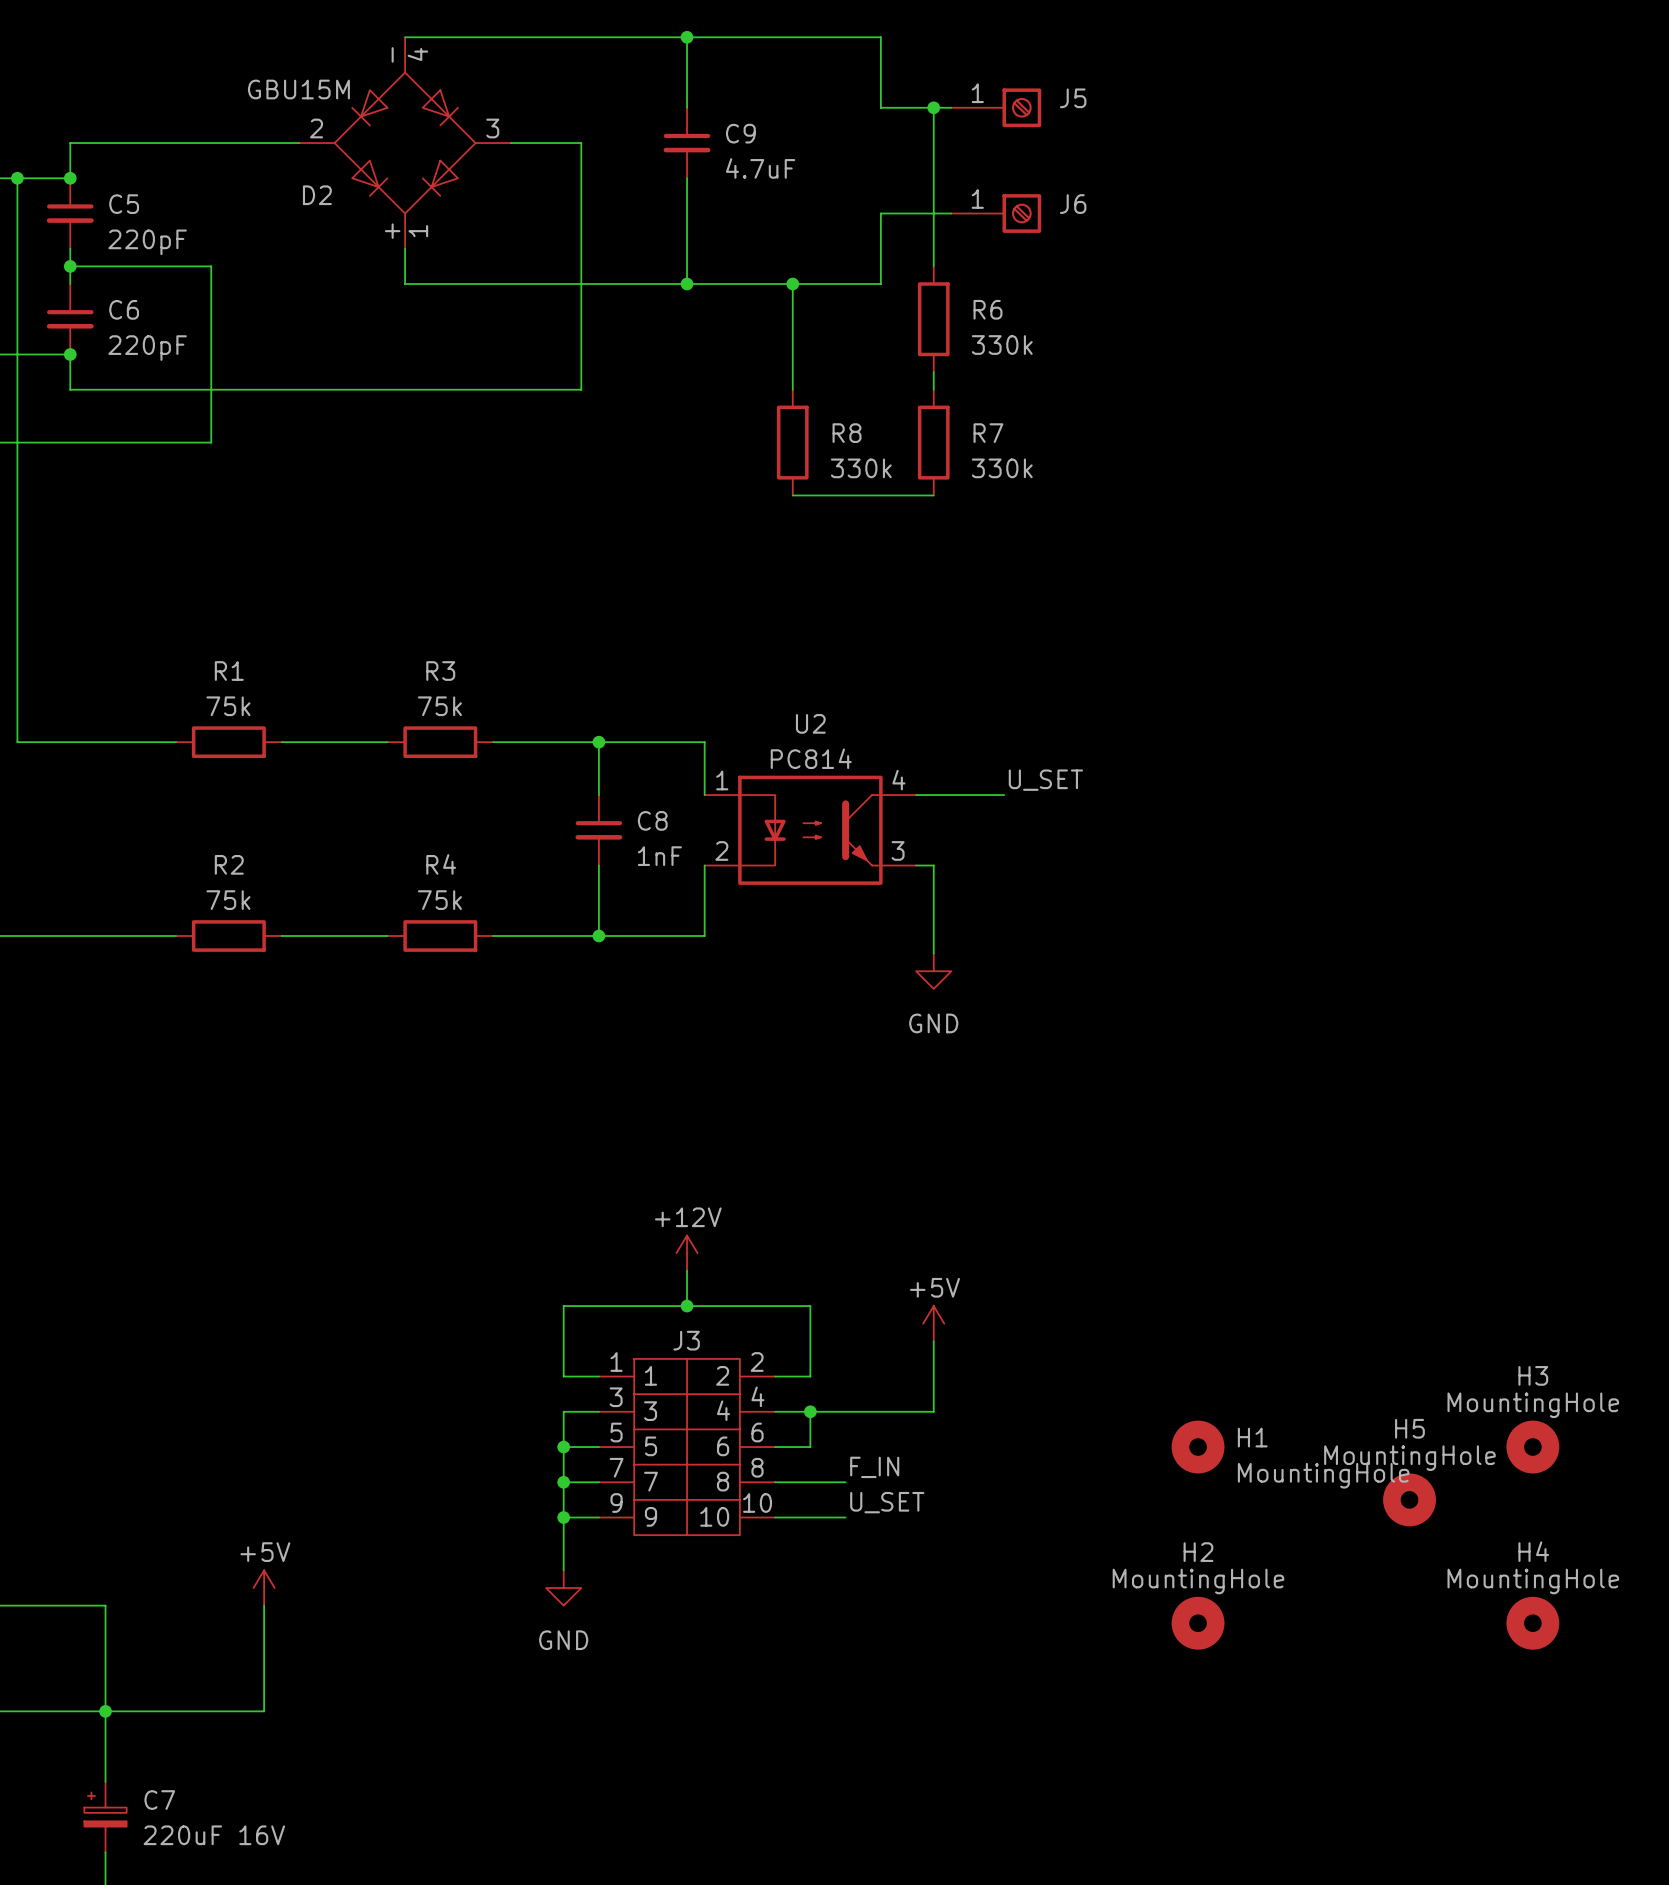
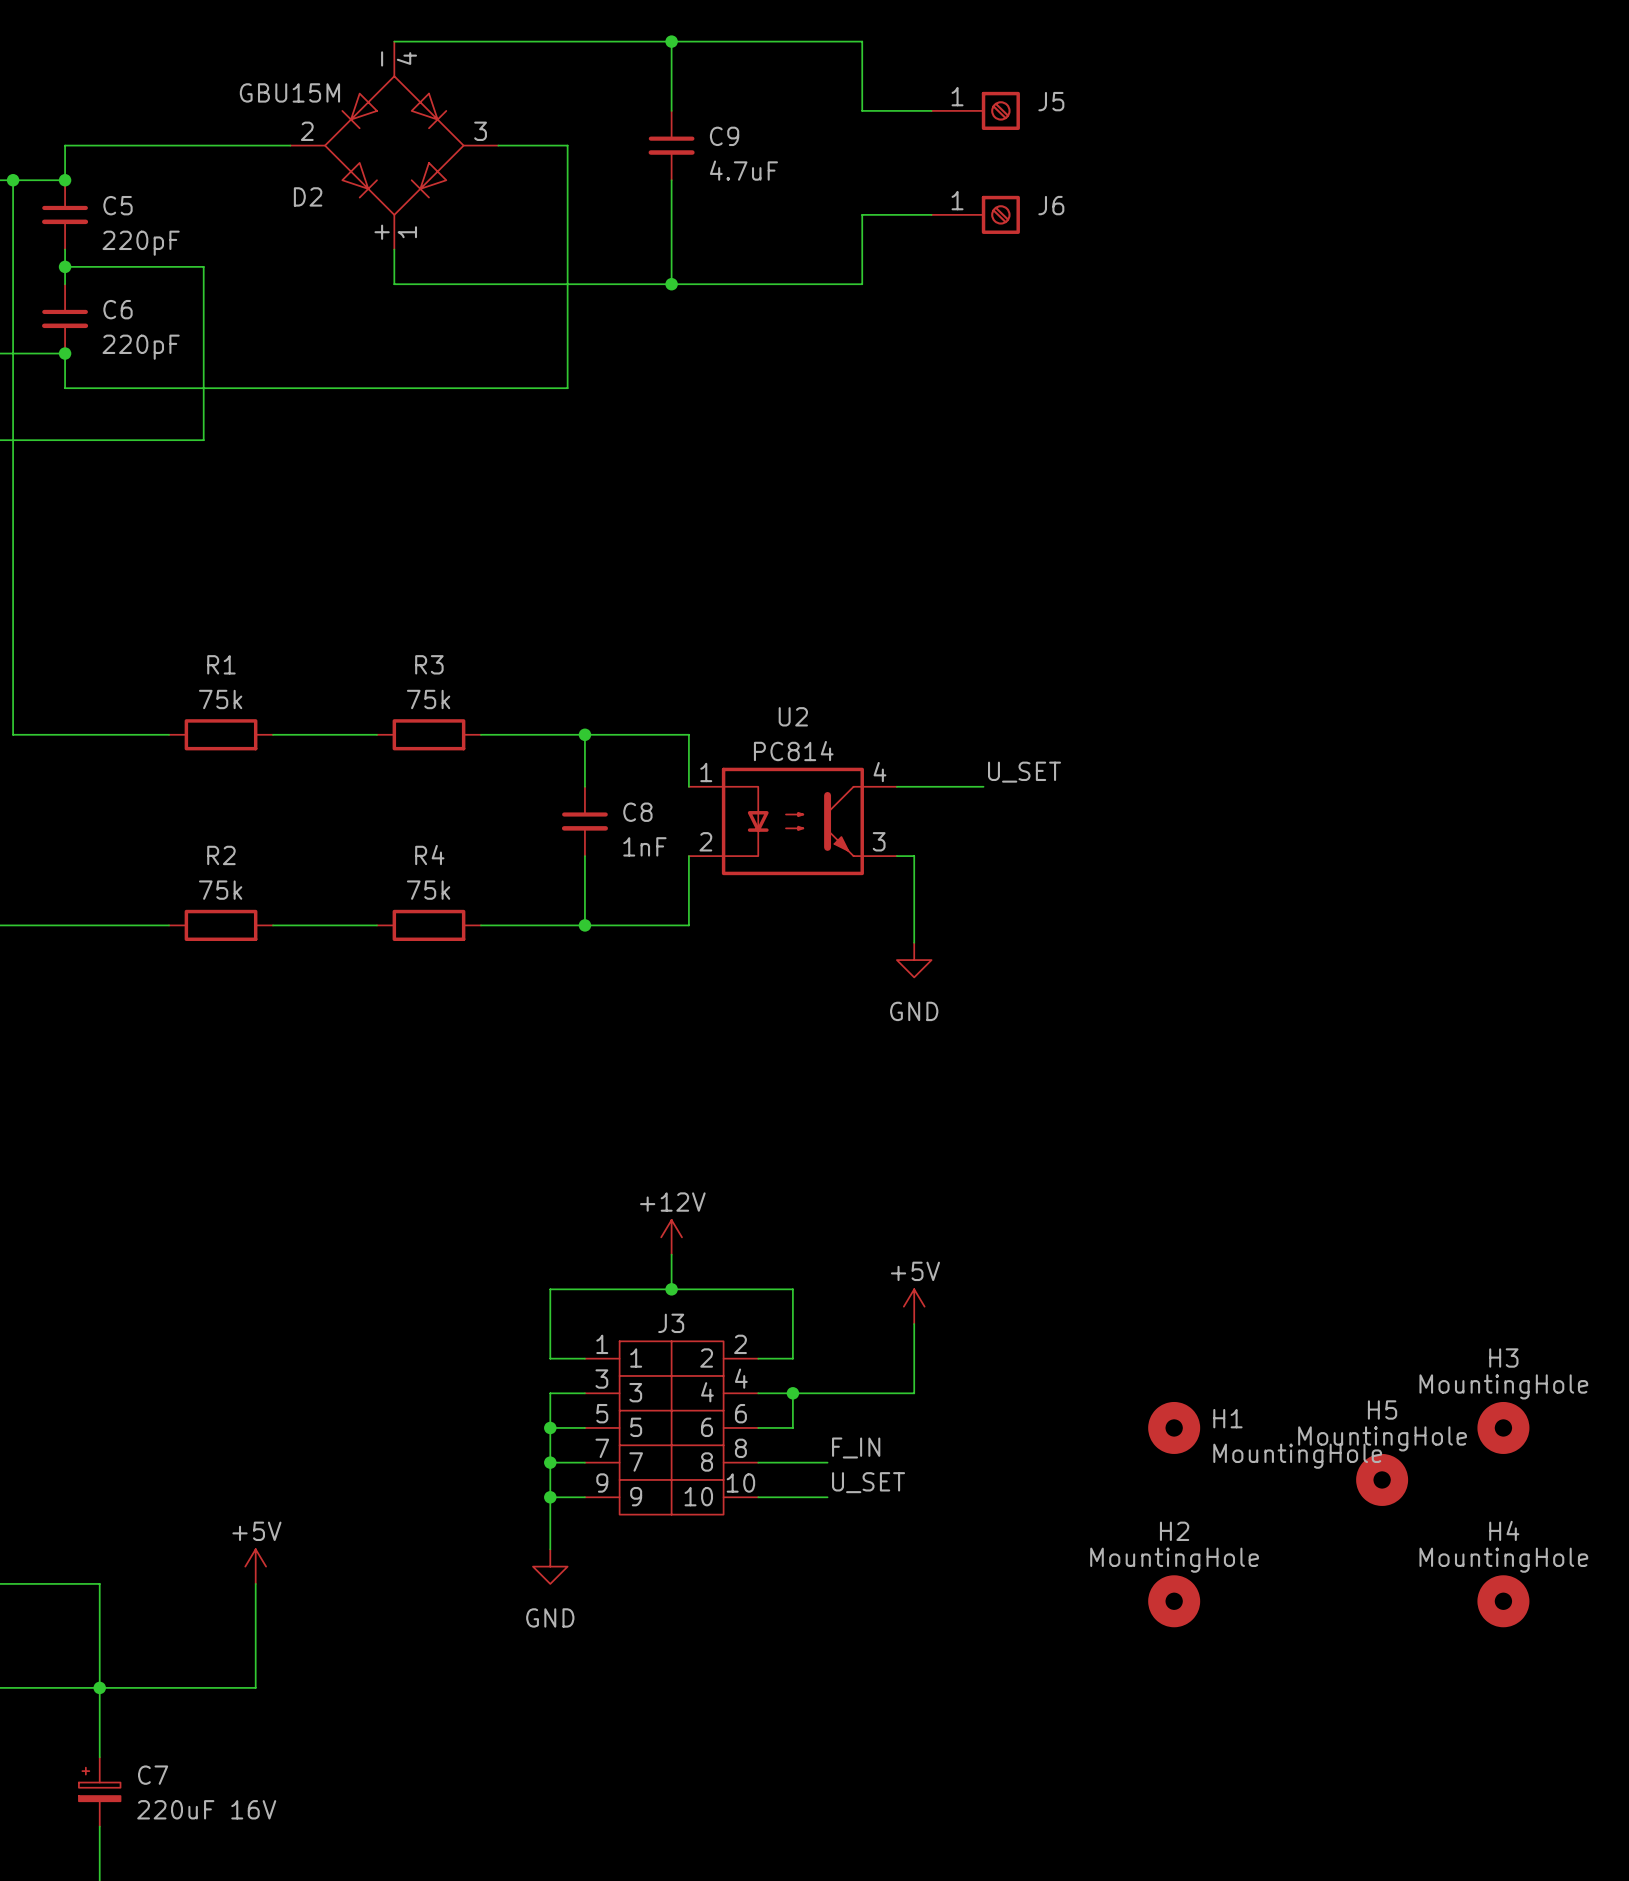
wire: (933, 107) (933, 266) -> none
junction: (933, 107) -> none
wire: (792, 284) (792, 389) -> none
junction: (792, 284) -> none
R6: 330k (933, 319) -> none
wire: (933, 372) (933, 389) -> none
R8: 330k (792, 442) -> none
R7: 330k (933, 442) -> none
wire: (792, 495) (933, 495) -> none

